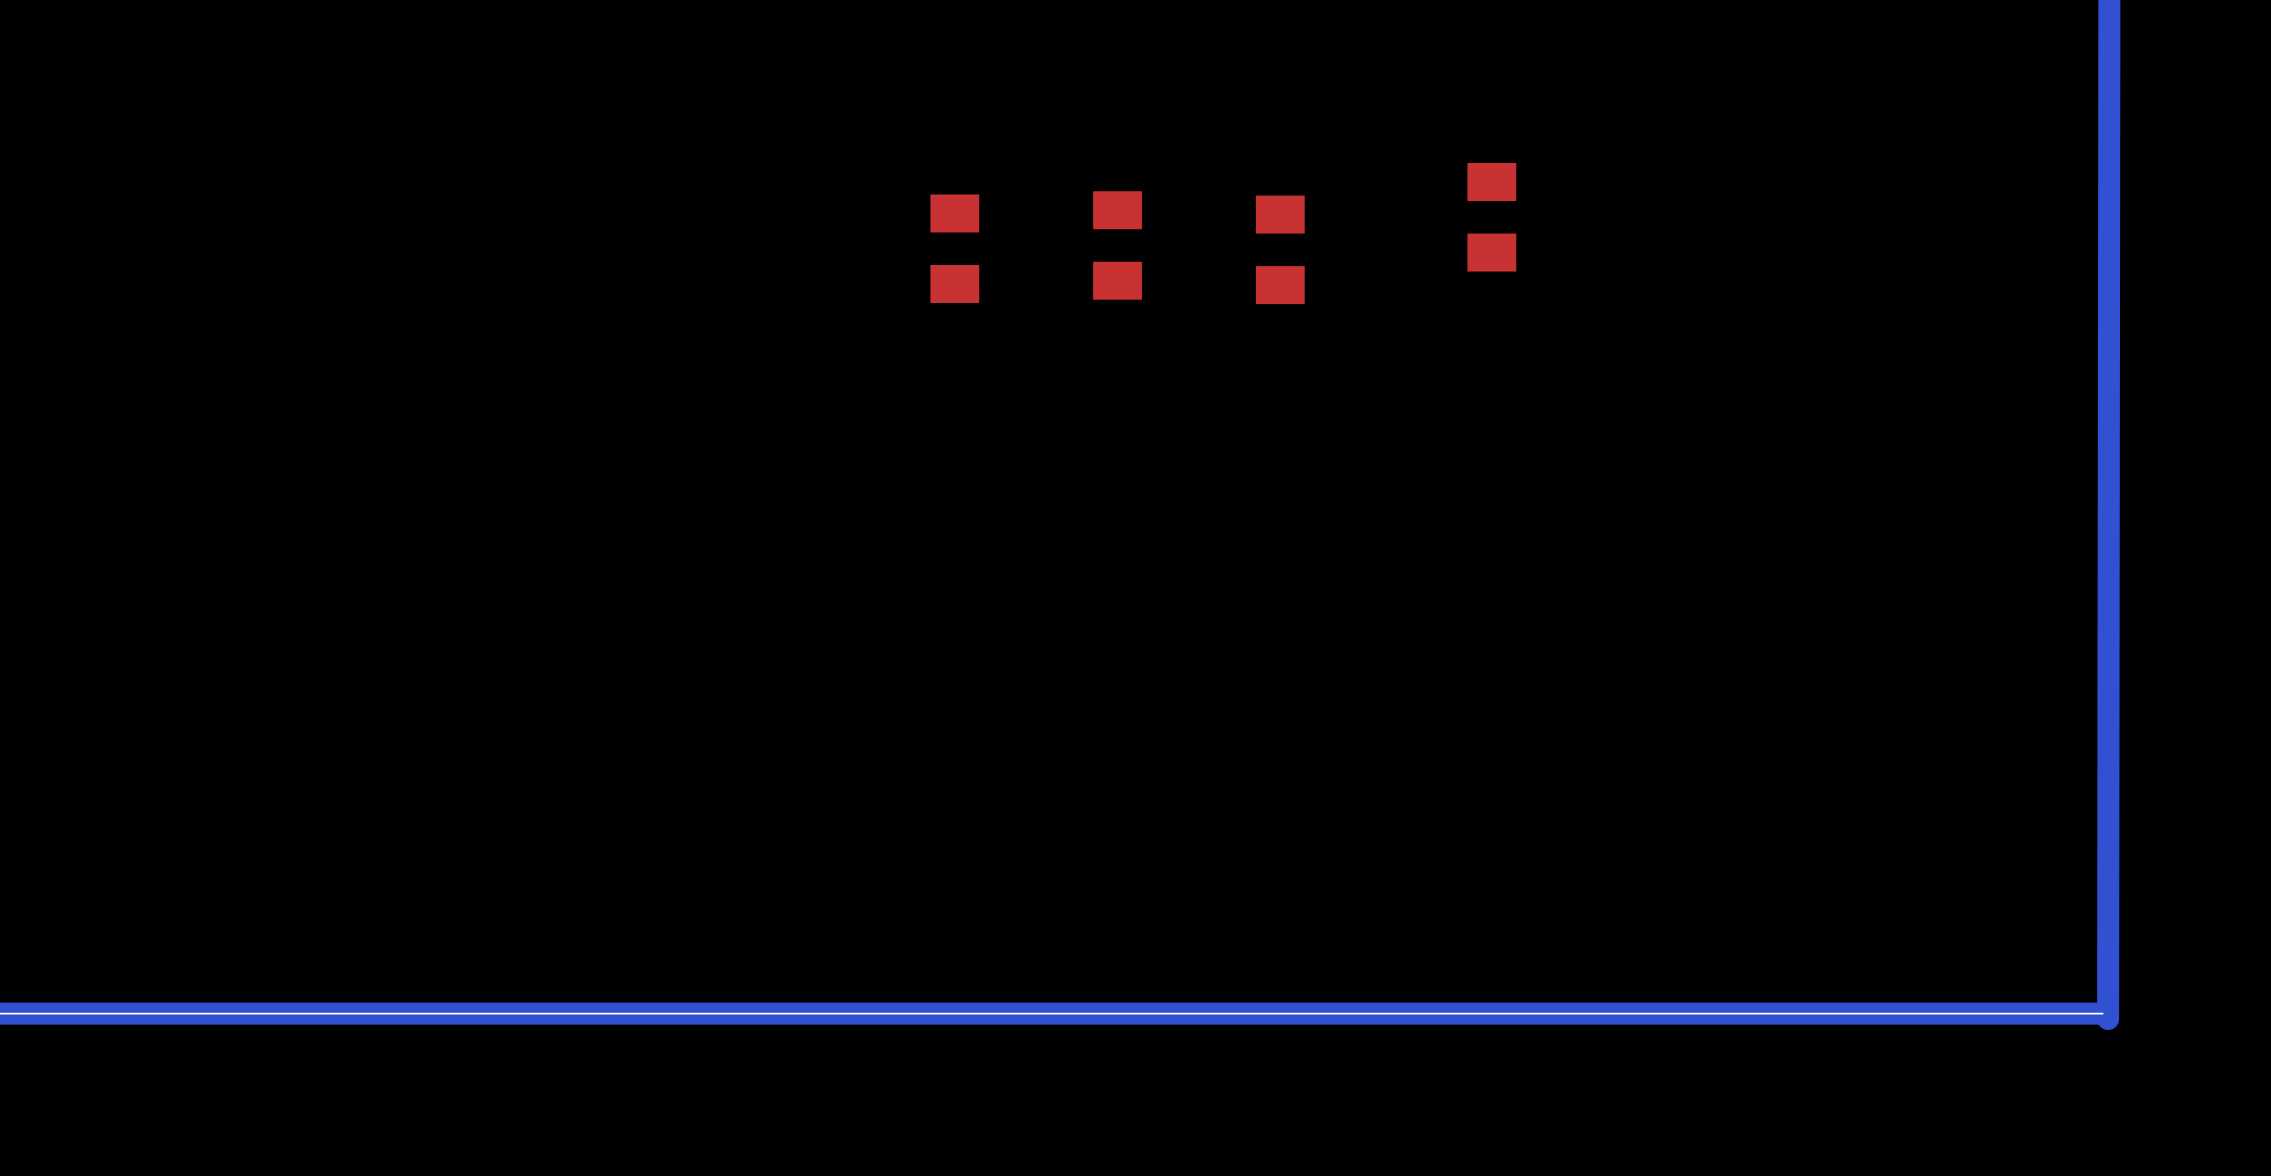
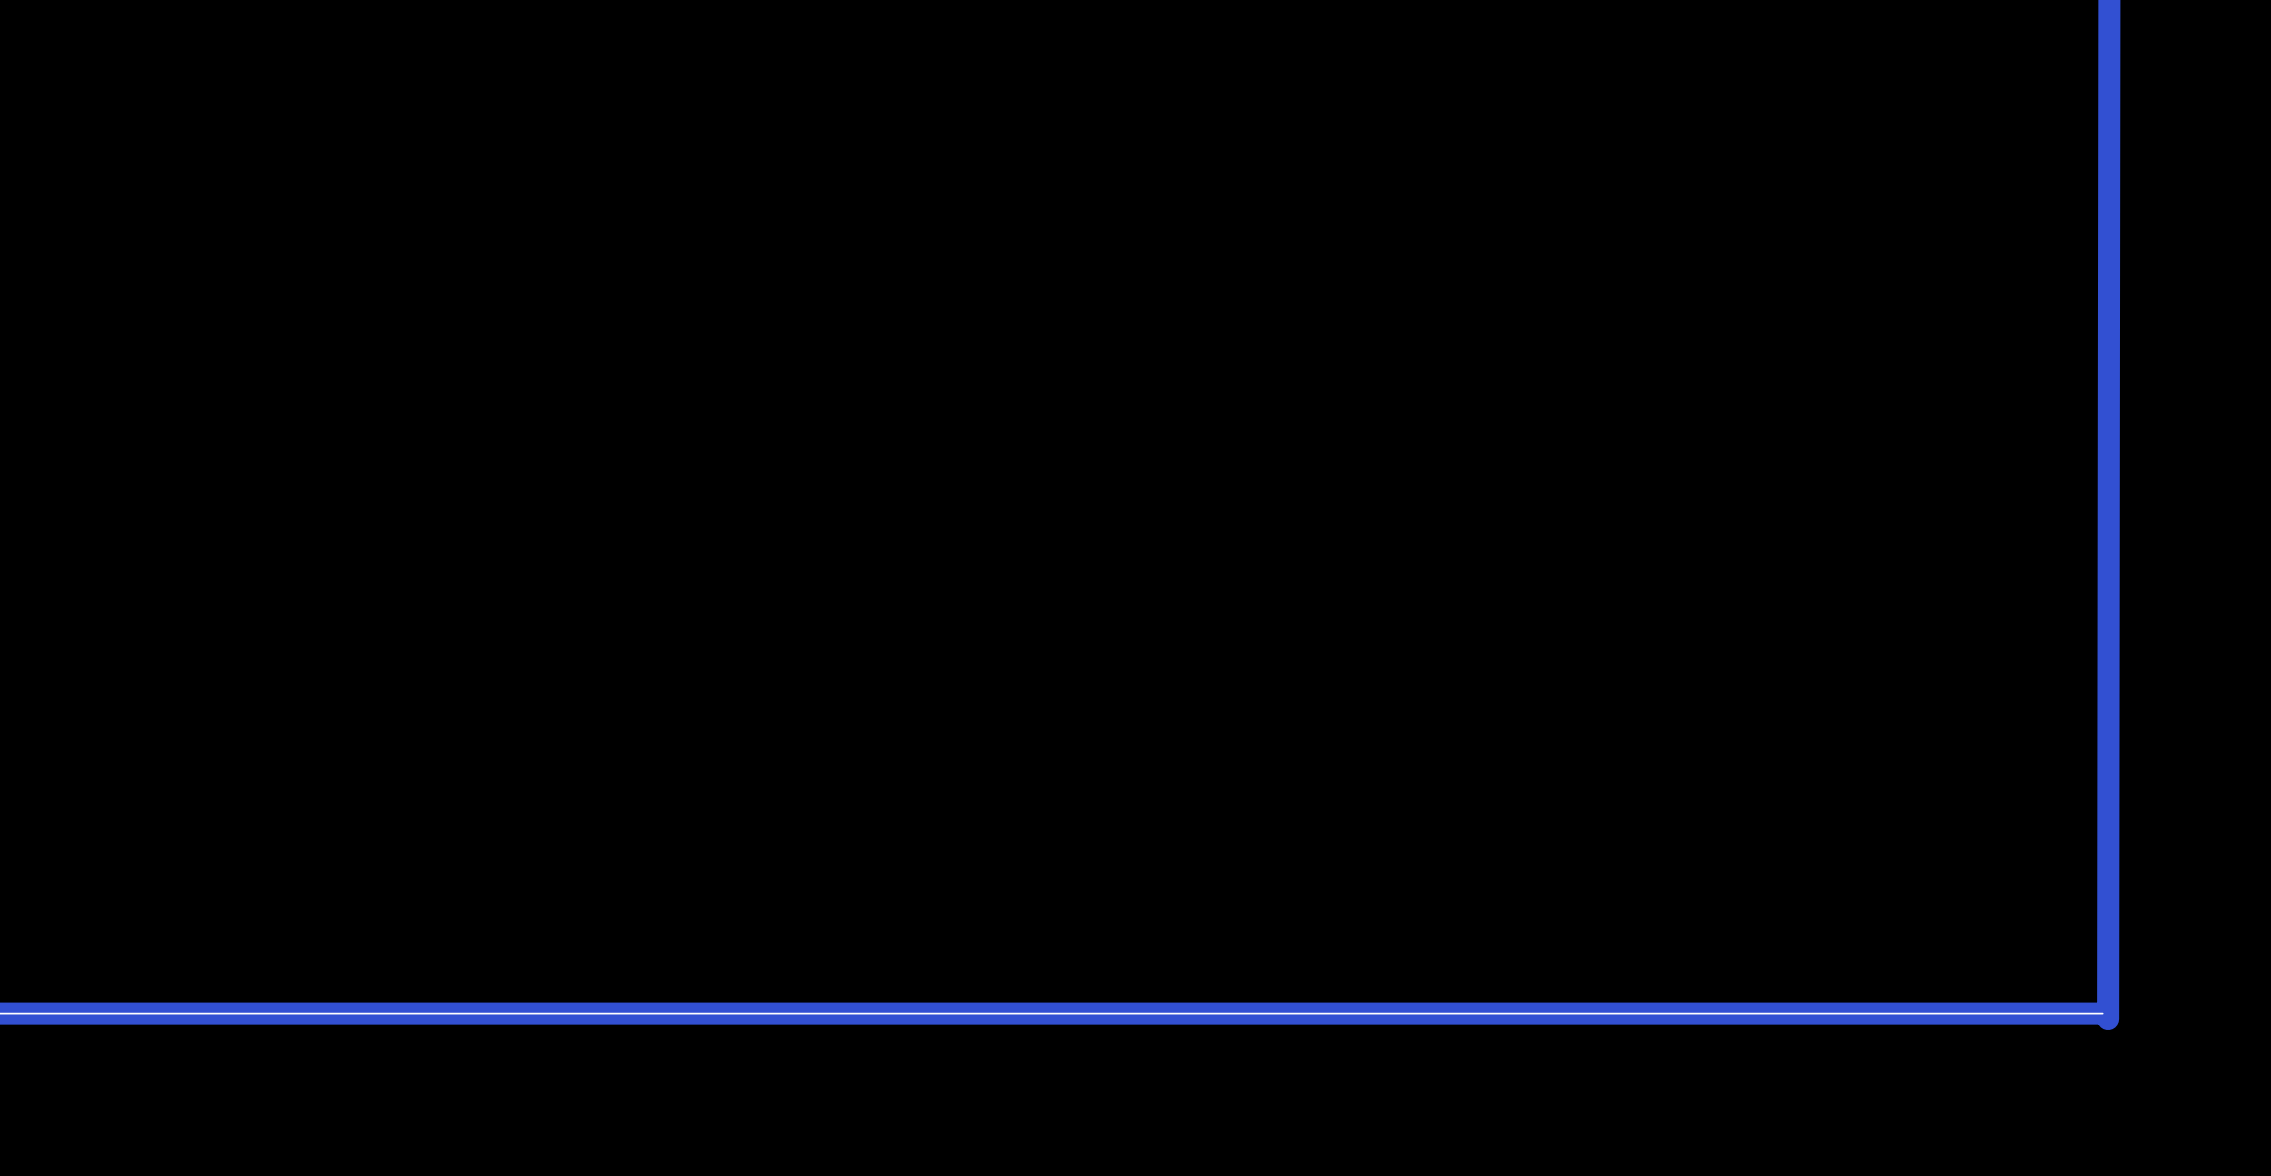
part: (1491, 217) -> none
part: (1117, 245) -> none
part: (954, 248) -> none
part: (1280, 249) -> none

